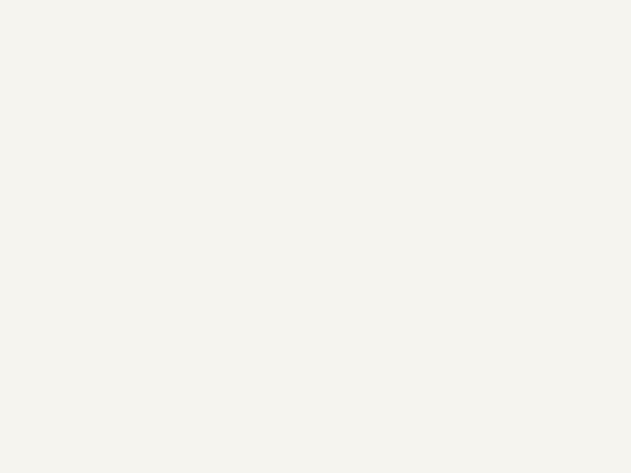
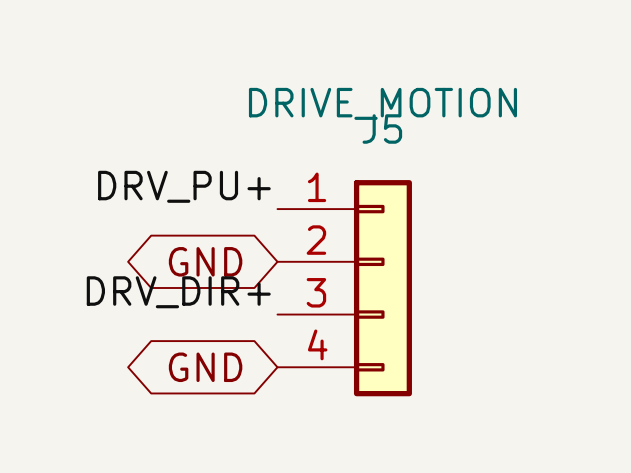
label: none -> DRV_PU+ (184, 186)
global label: none -> GND (205, 261)
J5: none -> DRIVE_MOTION (344, 288)
label: none -> DRV_DIR+ (178, 292)
global label: none -> GND (205, 367)

